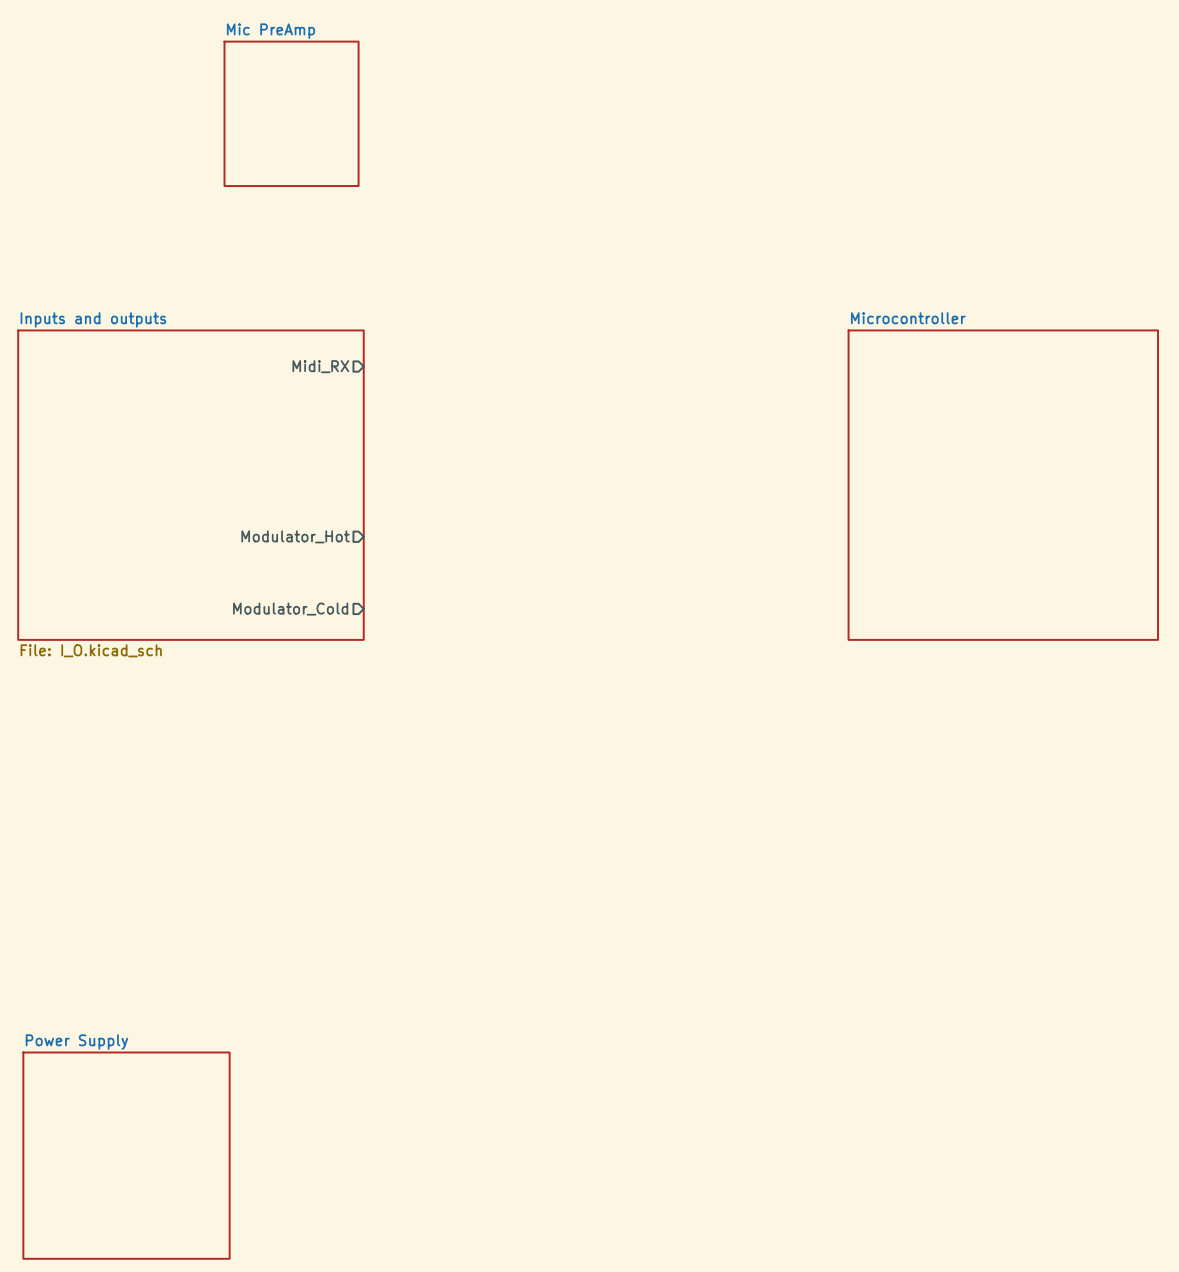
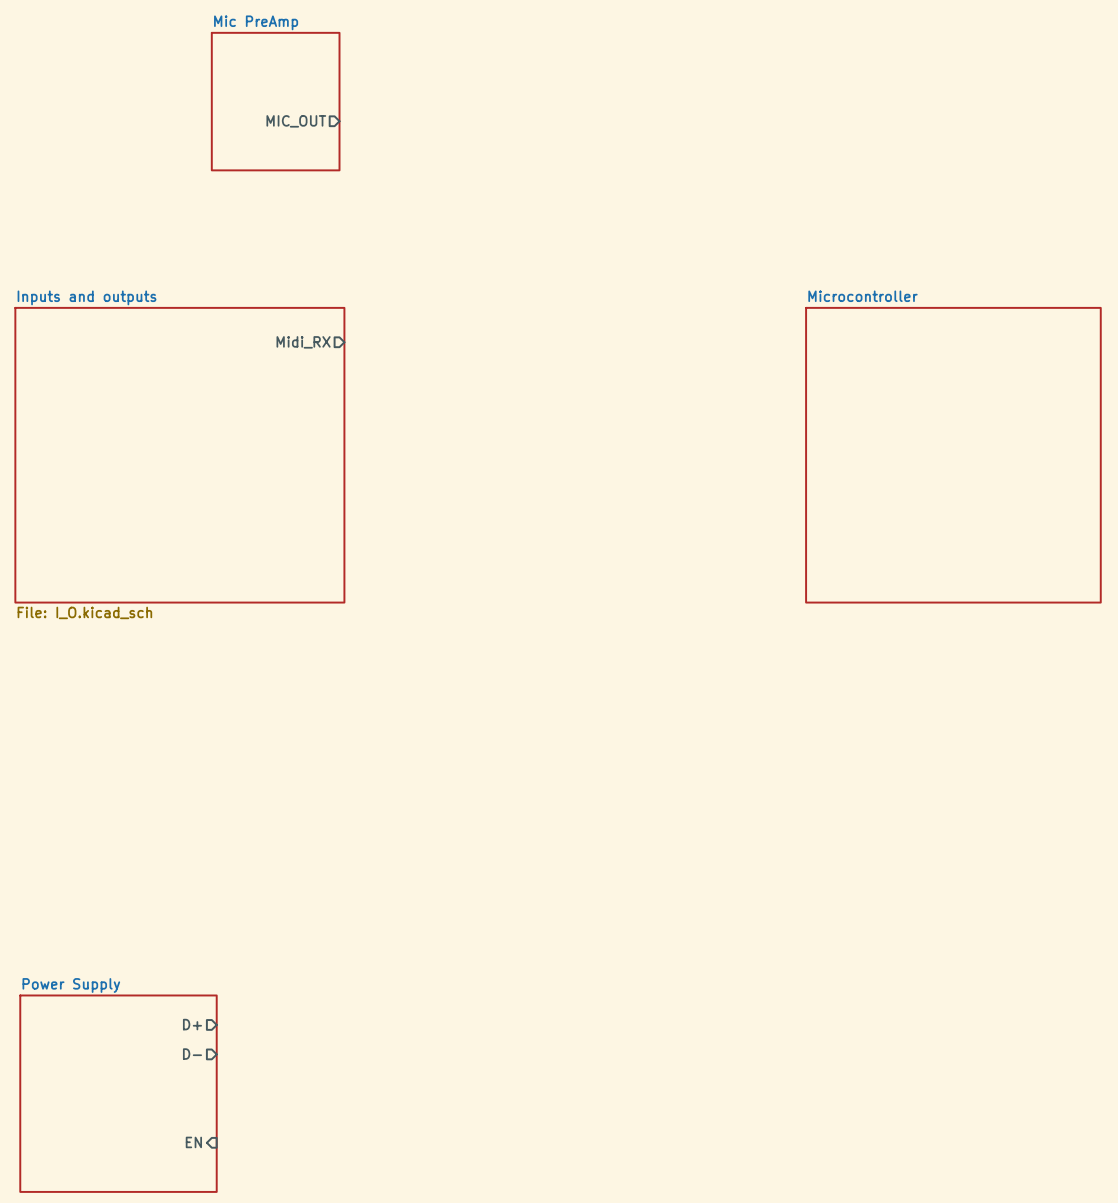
sheet pin: none -> MIC_OUT (296, 121)
sheet pin: Modulator_Hot (295, 536) -> none
sheet pin: Modulator_Cold (290, 609) -> none
sheet pin: none -> D+ (192, 1024)
sheet pin: none -> D- (192, 1054)
sheet pin: none -> EN (193, 1142)

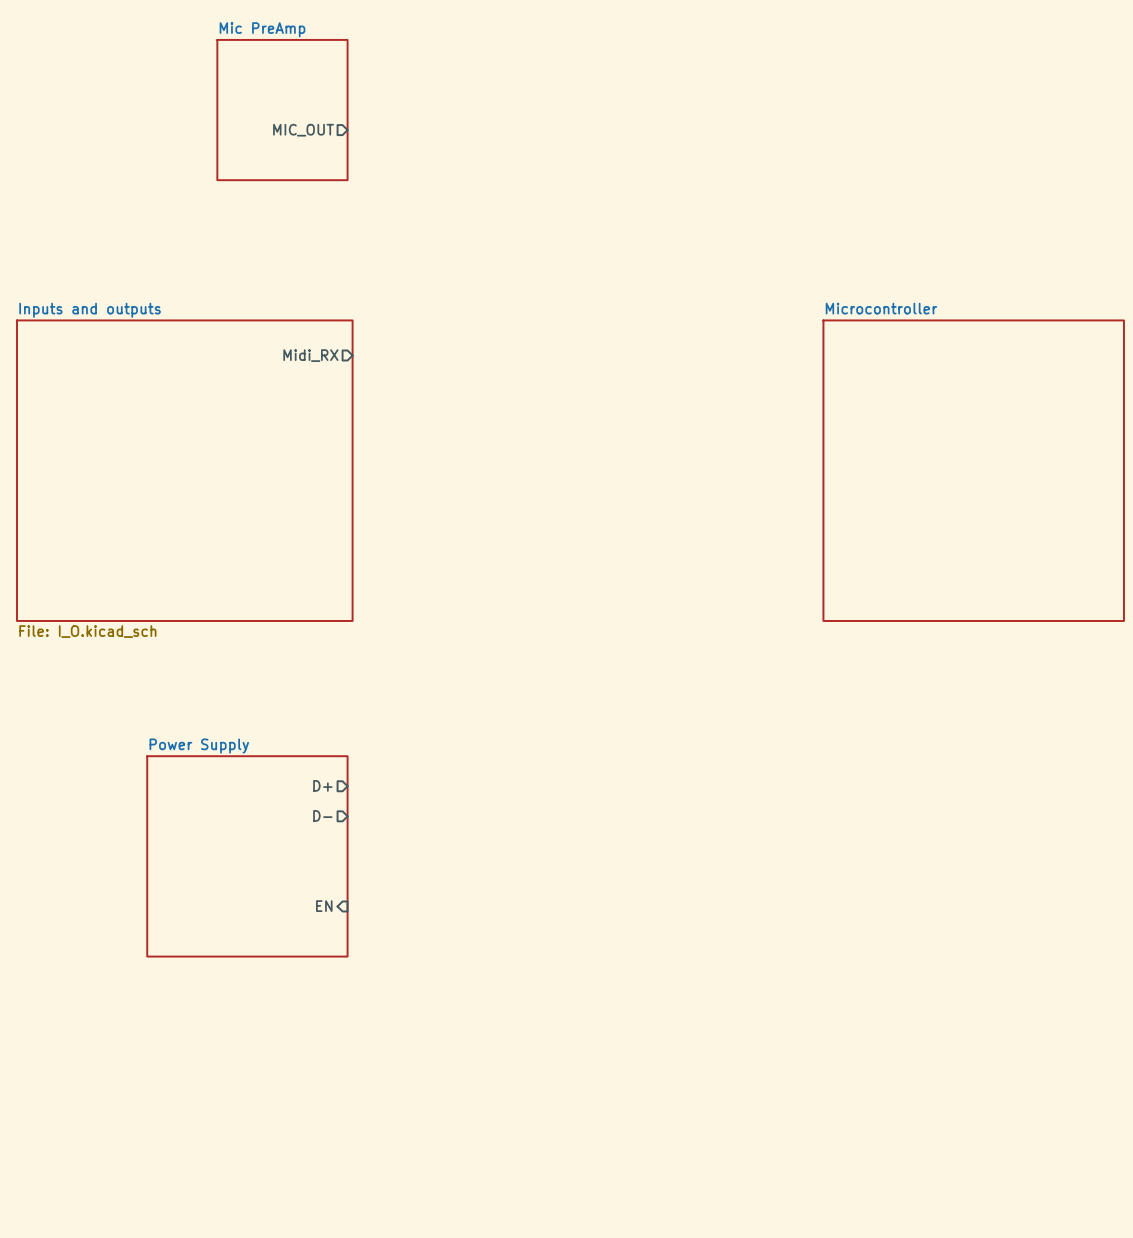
sheet pin: none -> D+ (322, 785)
sheet pin: none -> D- (322, 815)
sheet Power Supply: none -> (247, 856)
sheet pin: none -> EN (324, 906)
sheet pin: D+ (192, 1024) -> none
sheet pin: D- (192, 1054) -> none
sheet Power Supply: (118, 1093) -> none
sheet pin: EN (193, 1142) -> none

